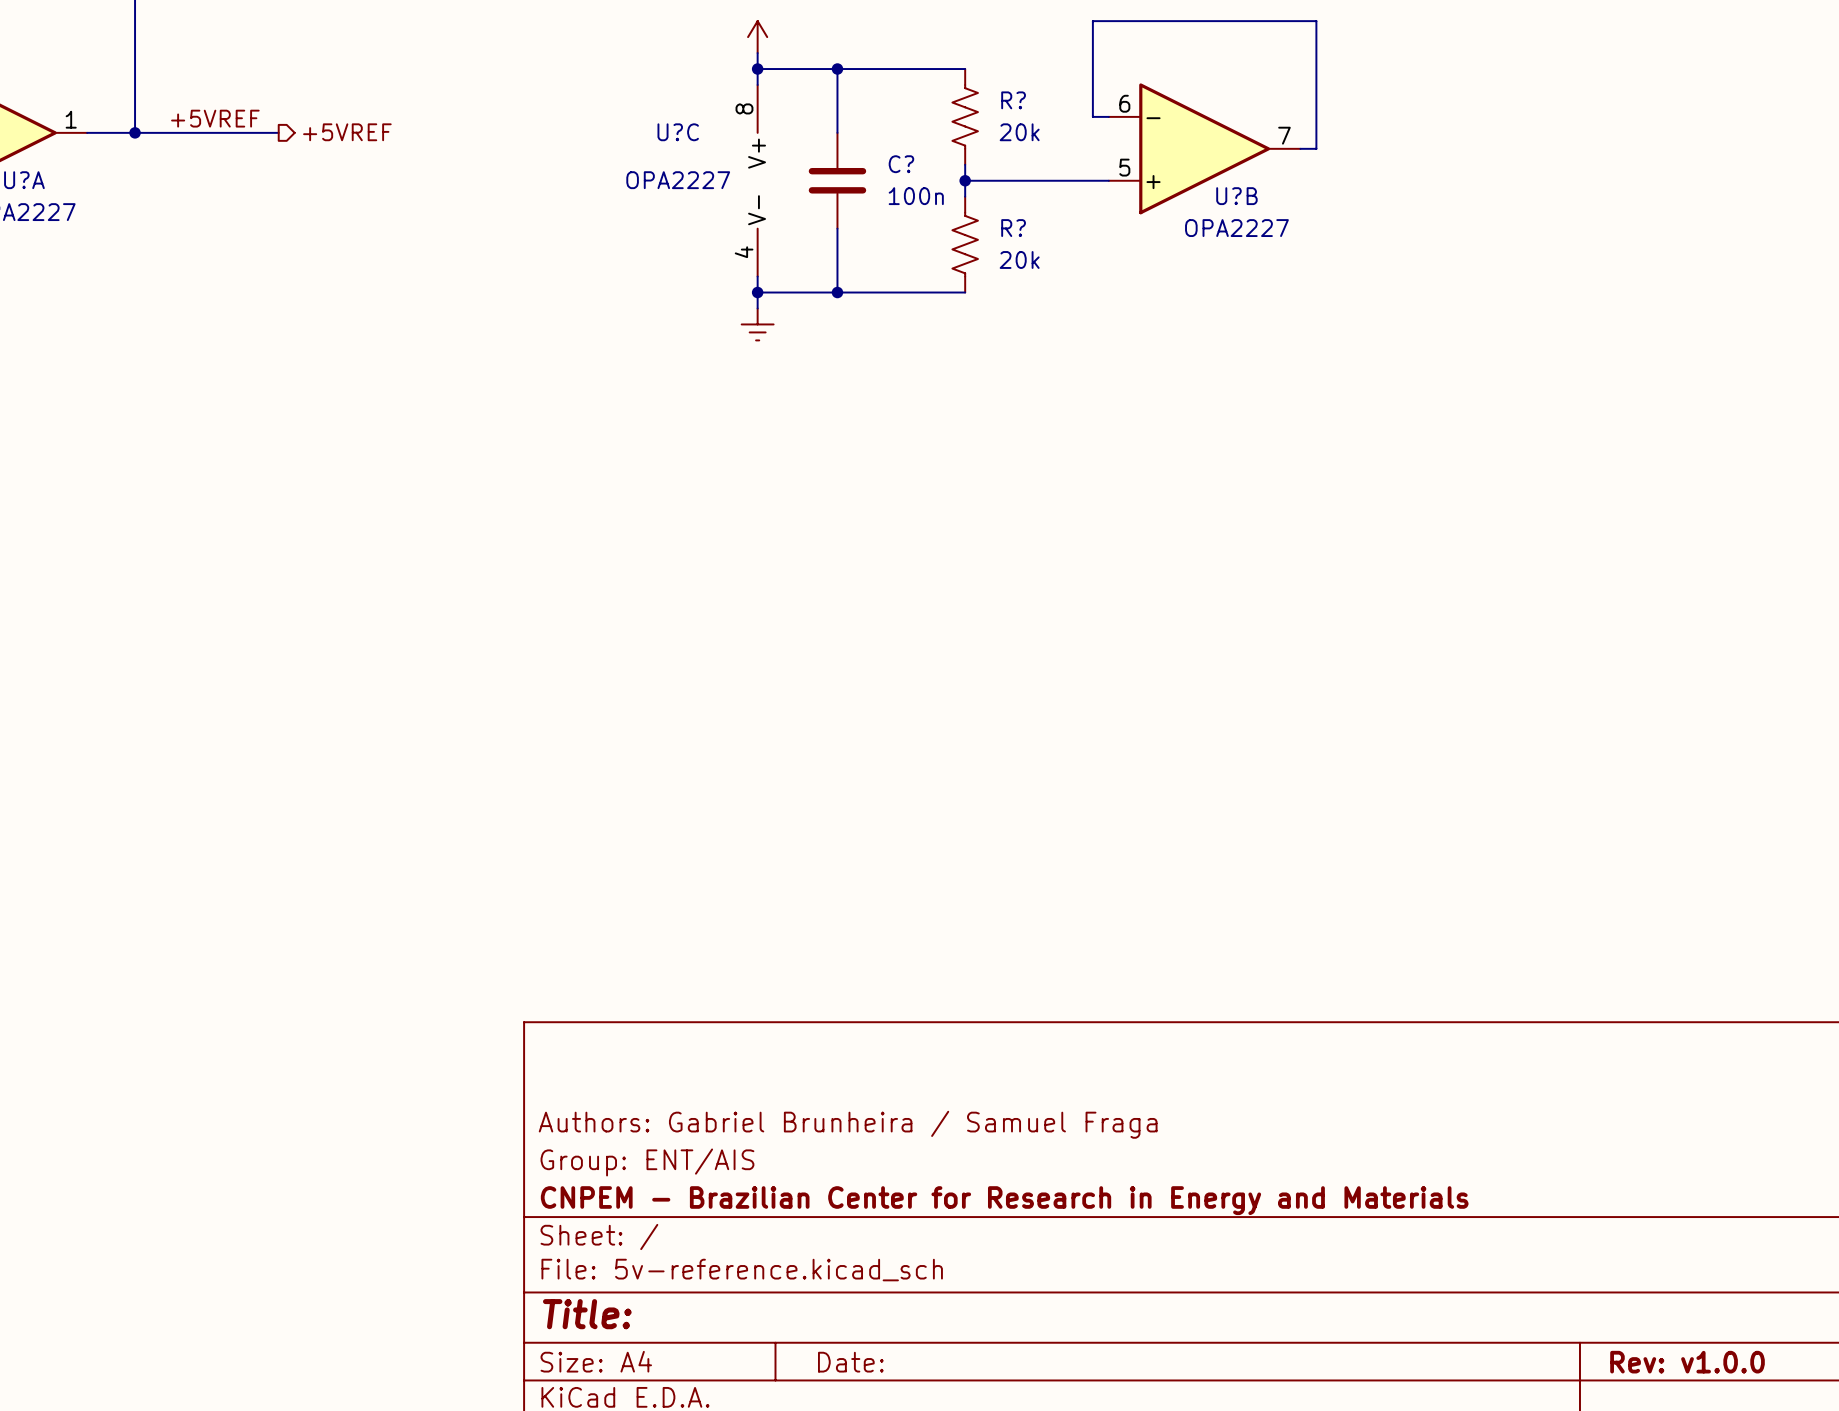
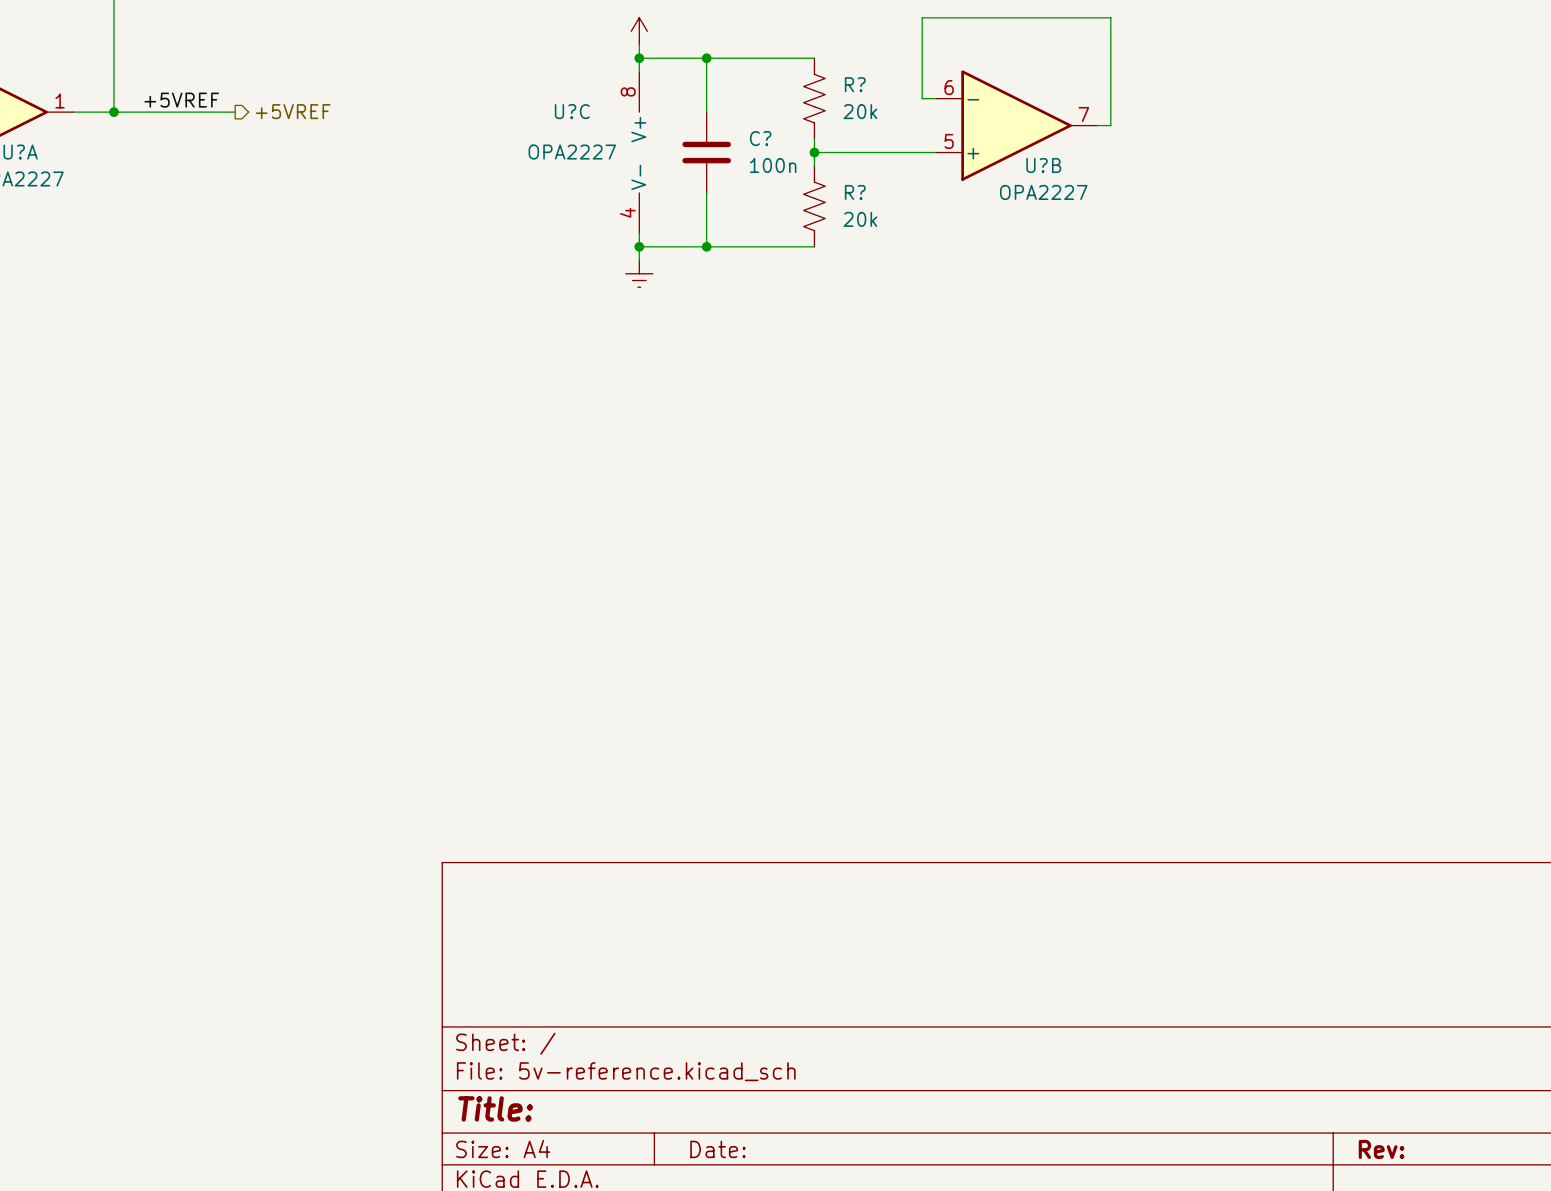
title block: Authors: Gabriel Brunheira / Samuel Fraga (848, 1124) -> none
title block: Group: ENT/AIS (647, 1162) -> none
title block: CNPEM - Brazilian Center for Research in Energy and Materials (1004, 1200) -> none
title block: Rev: v1.0.0 (1687, 1362) -> Rev: (1381, 1149)

